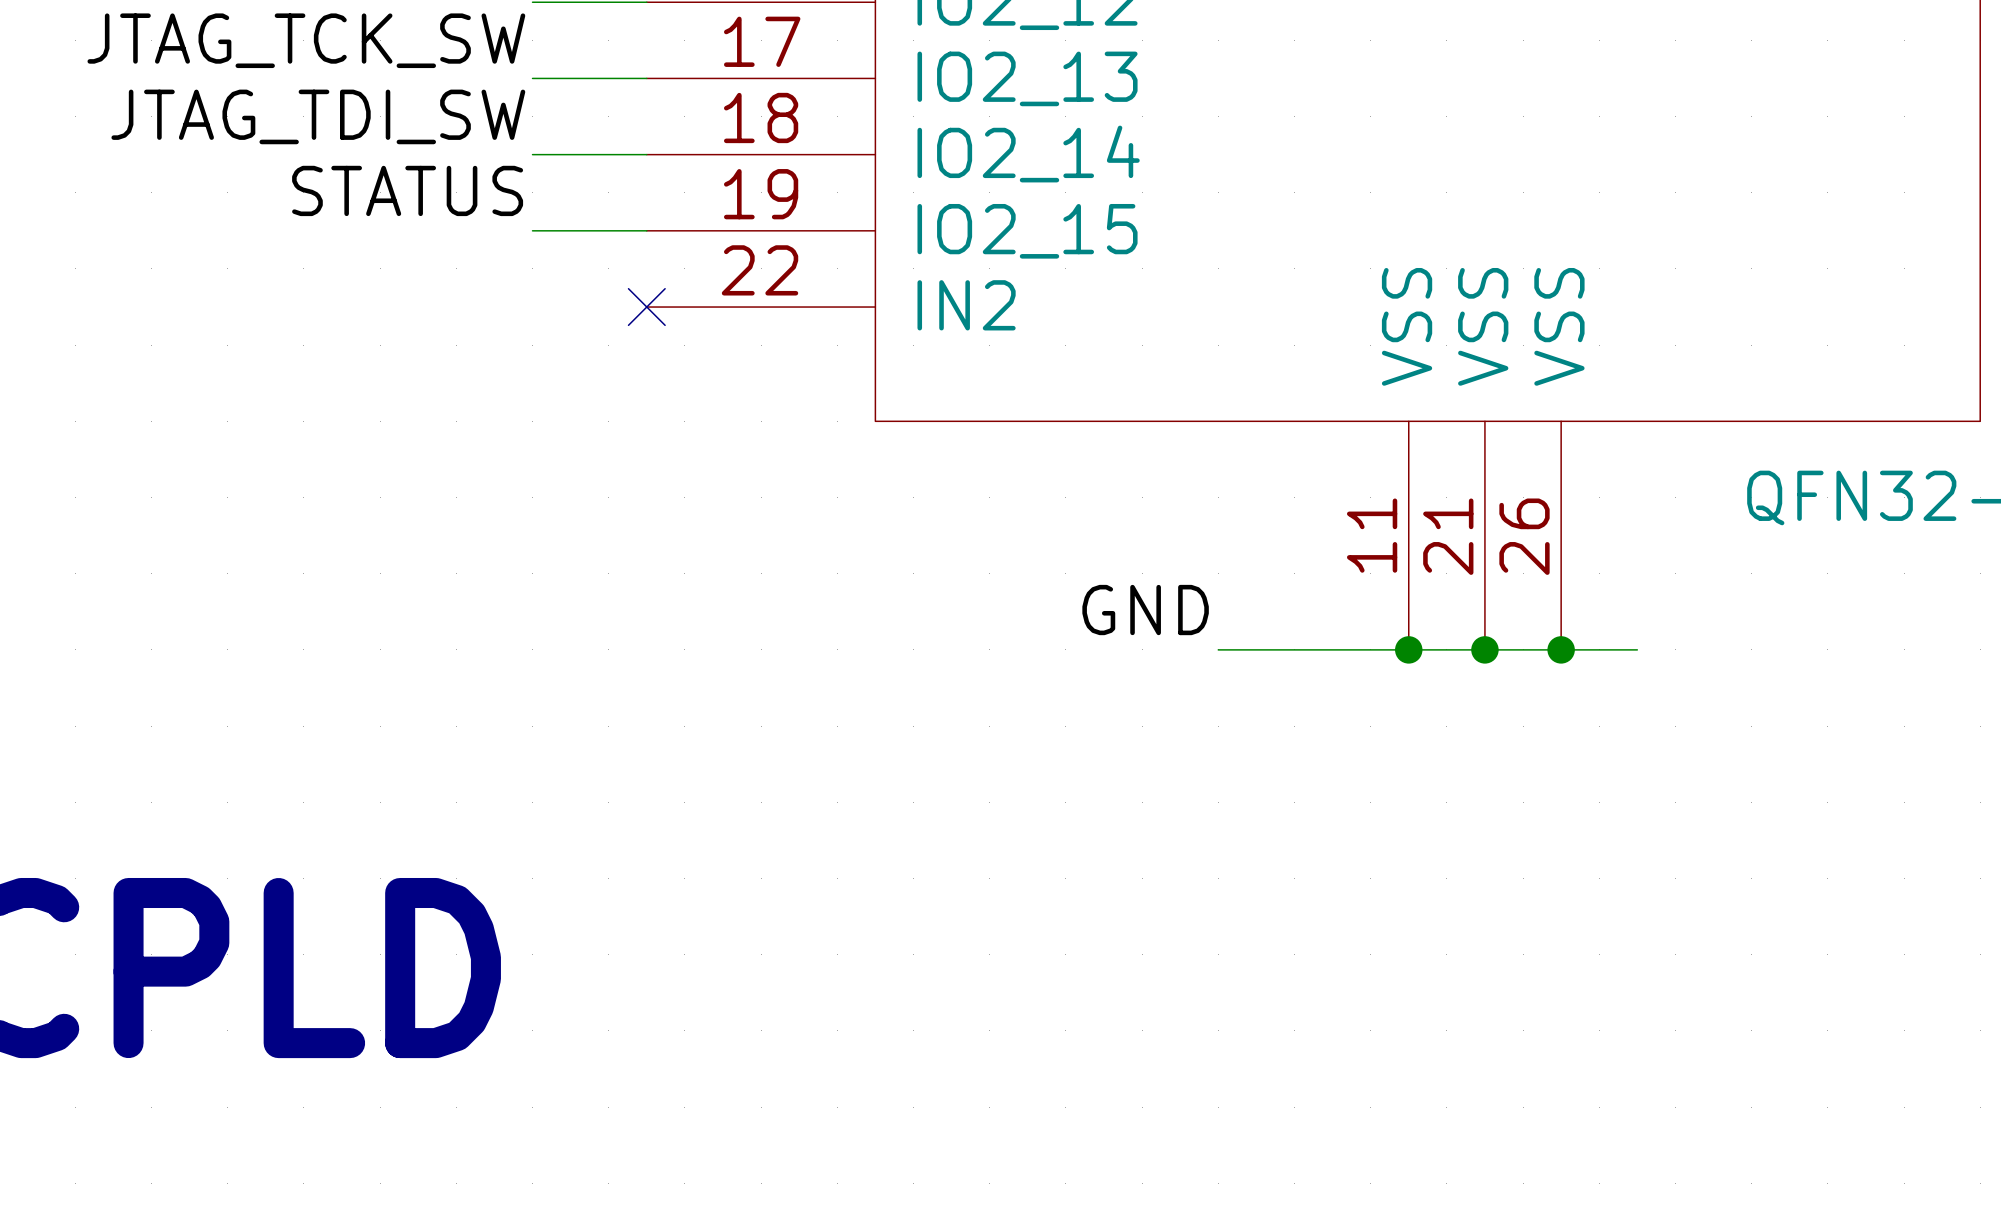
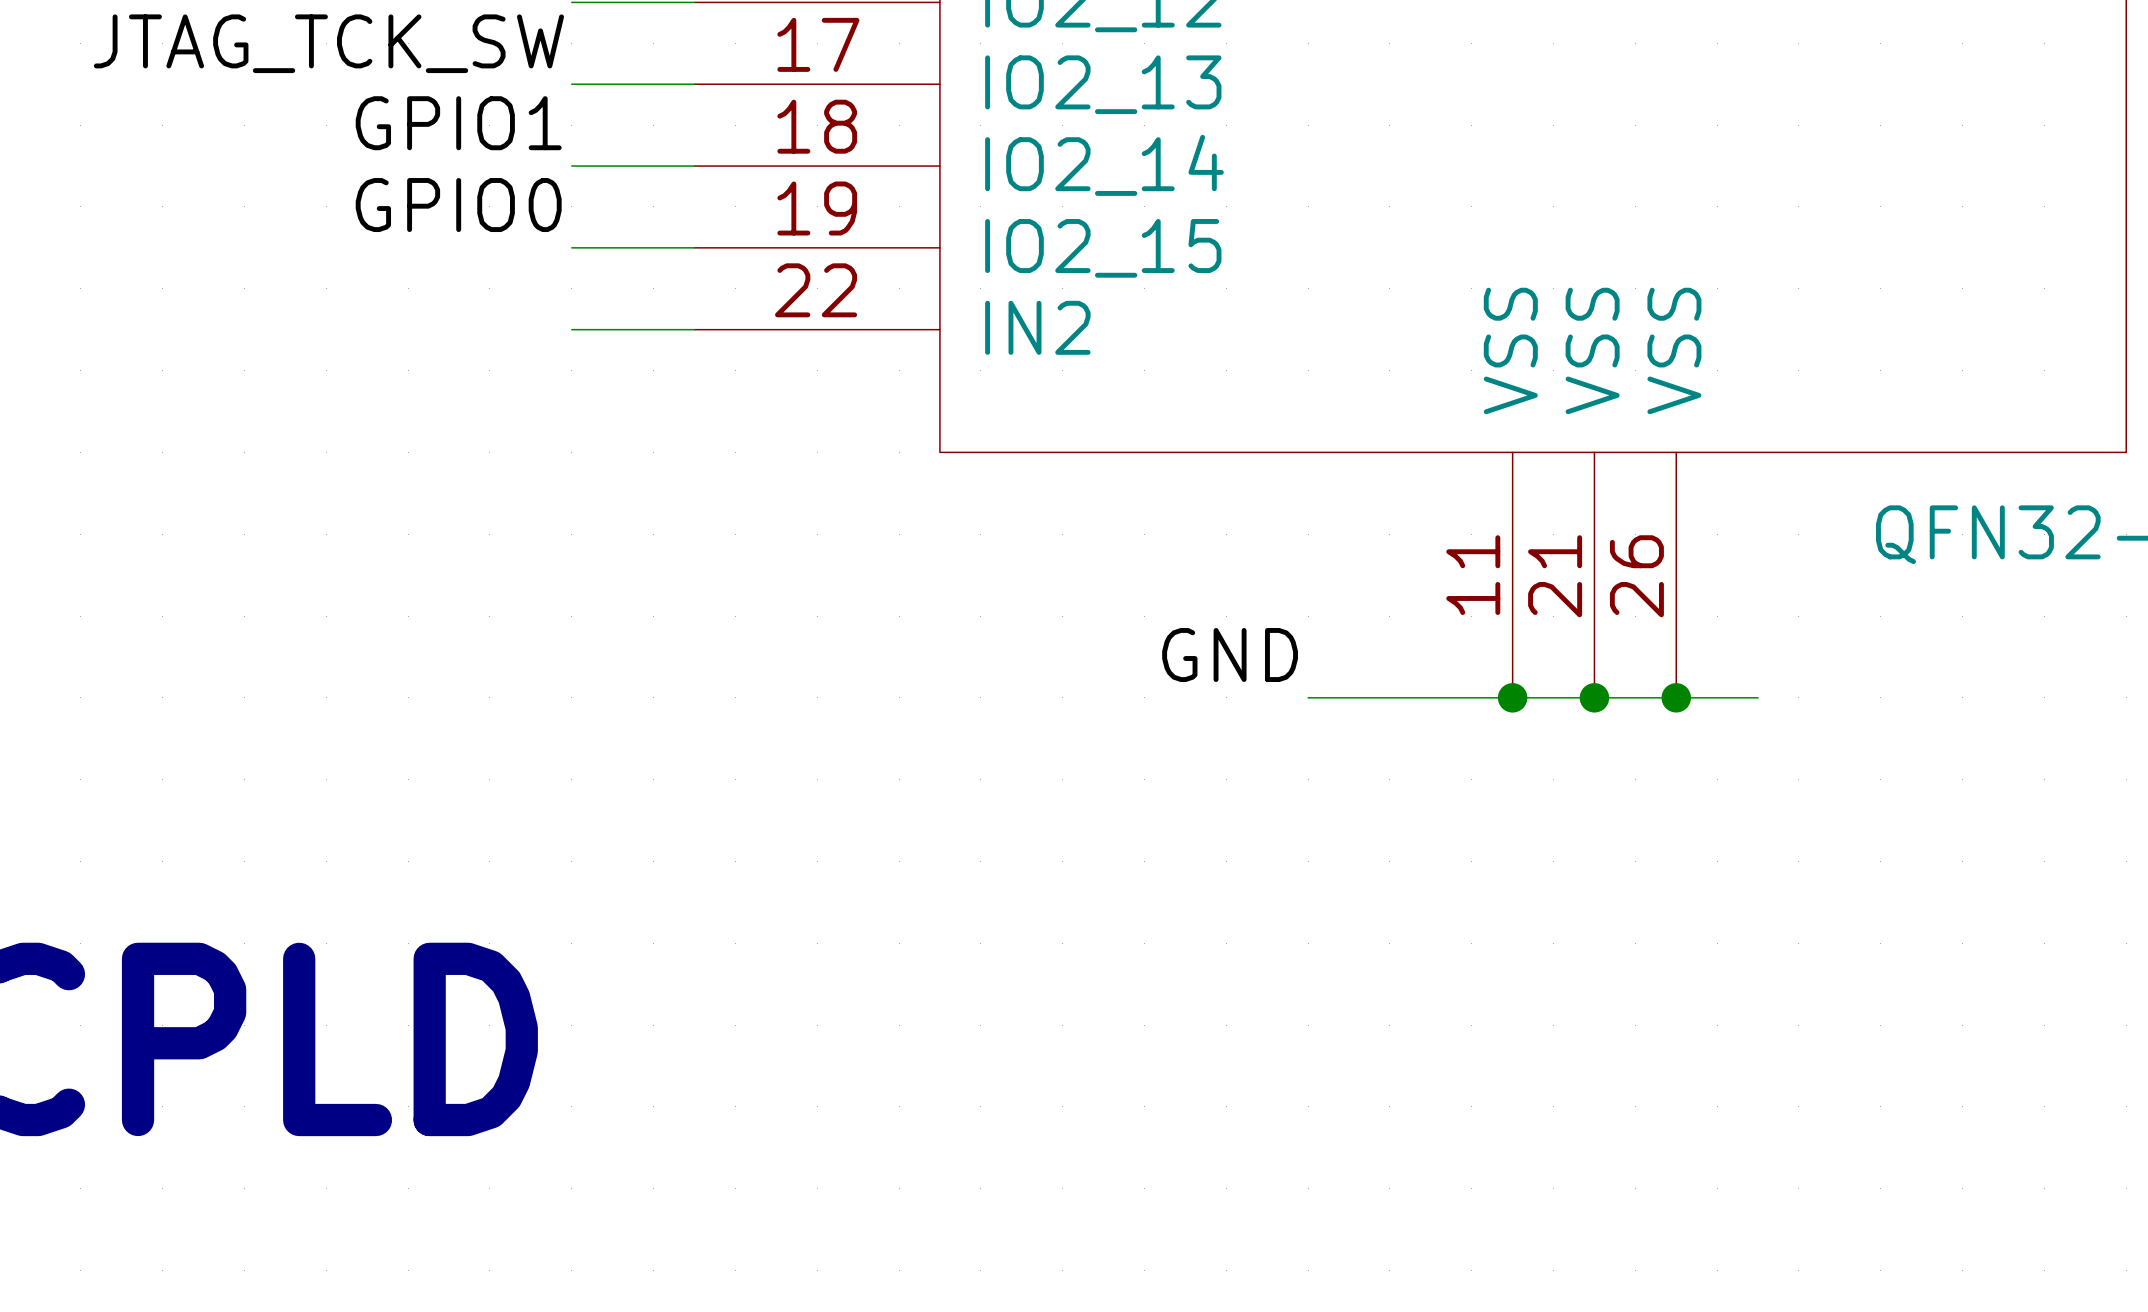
label: JTAG_TDI_SW (318, 116) -> GPIO1 (458, 123)
label: STATUS (407, 190) -> GPIO0 (458, 205)
wire: none -> (571, 329) (694, 329)
no-connect mark: (646, 307) -> none

